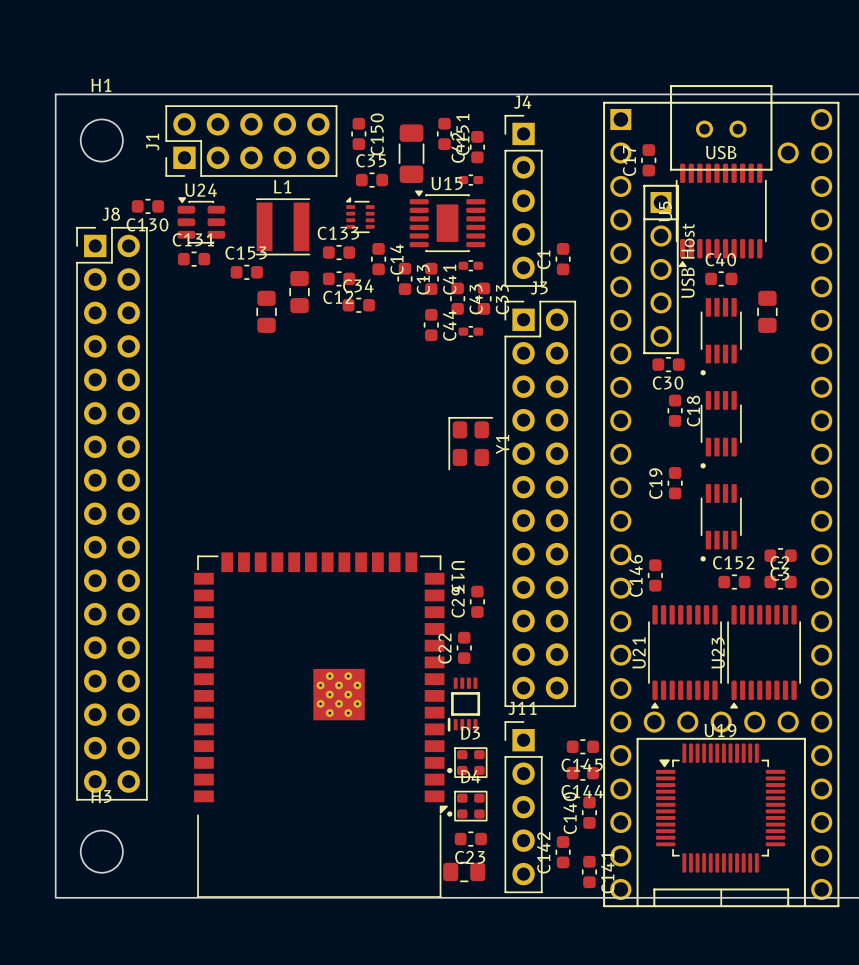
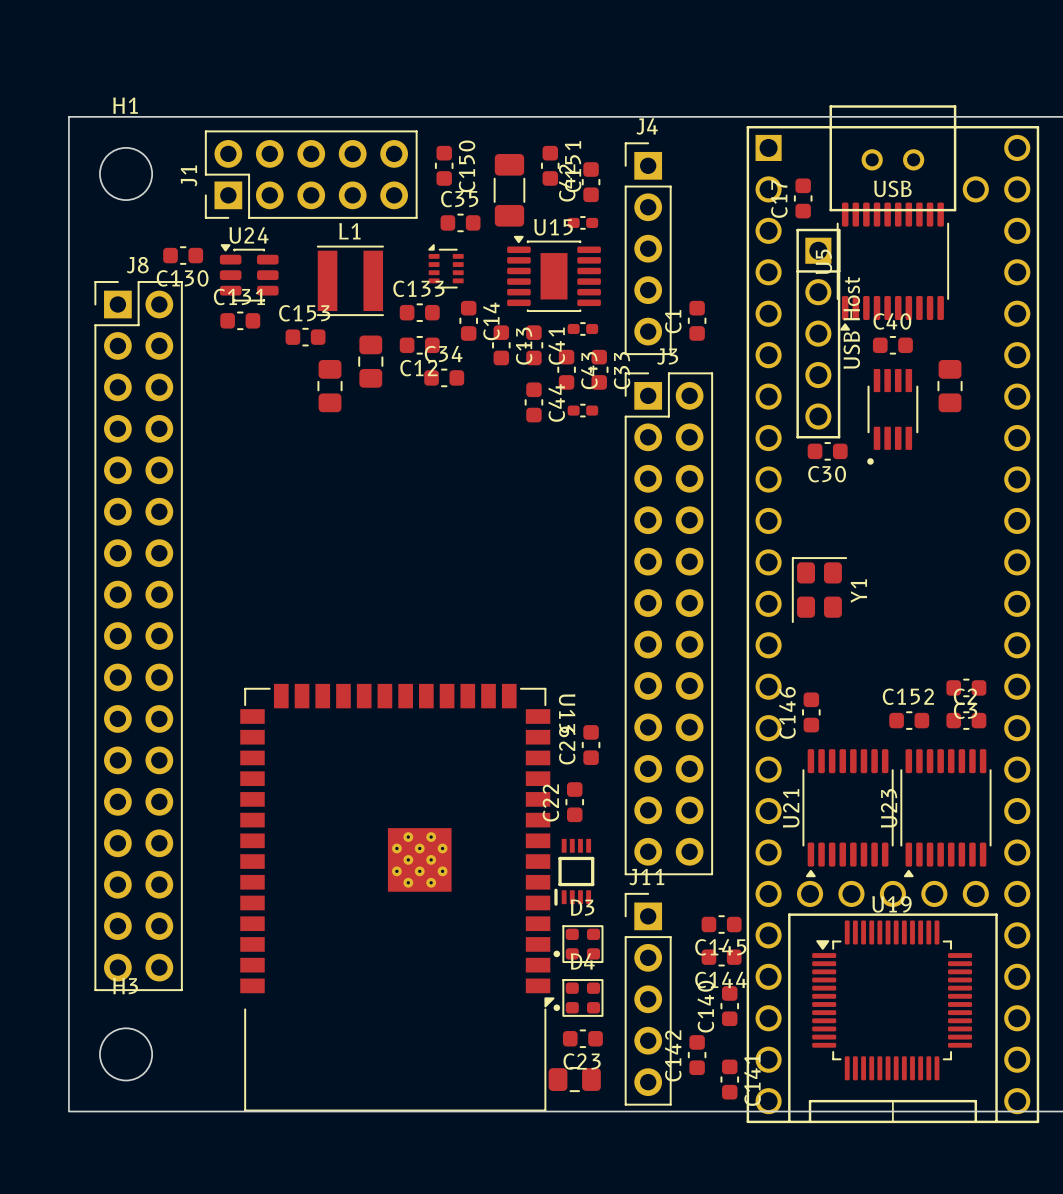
C18: (675, 410) -> none
part: (721, 429) -> none
Y1 position: (470, 443) -> (819, 590)
C19: (675, 483) -> none
part: (721, 522) -> none

